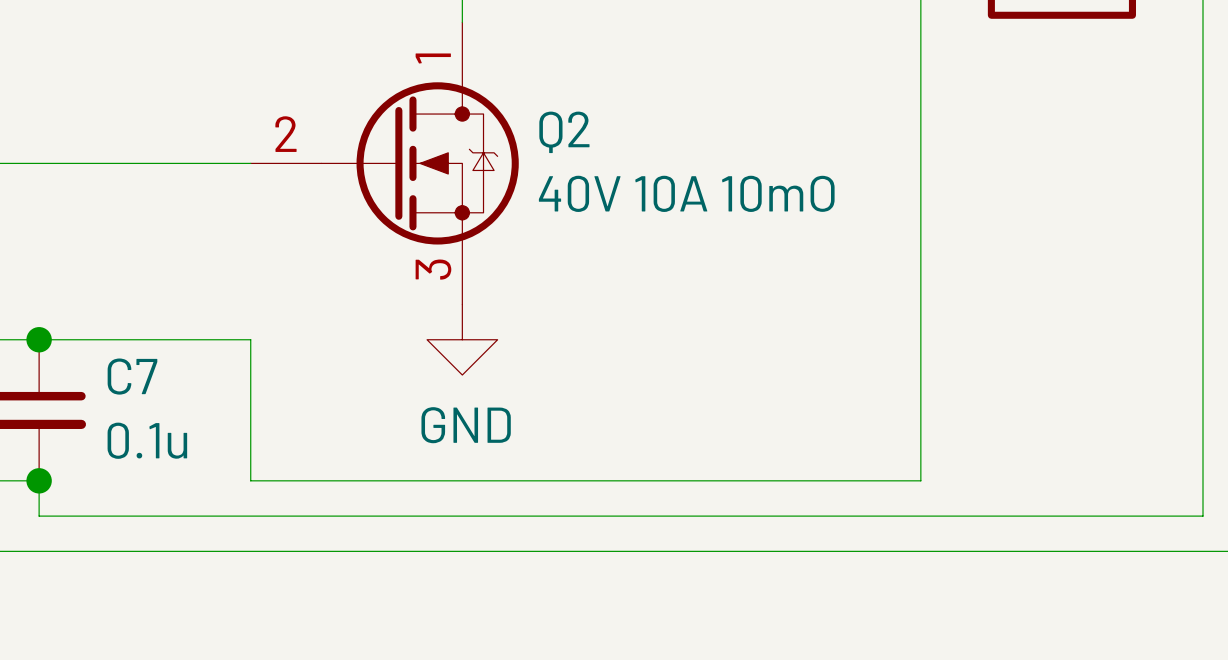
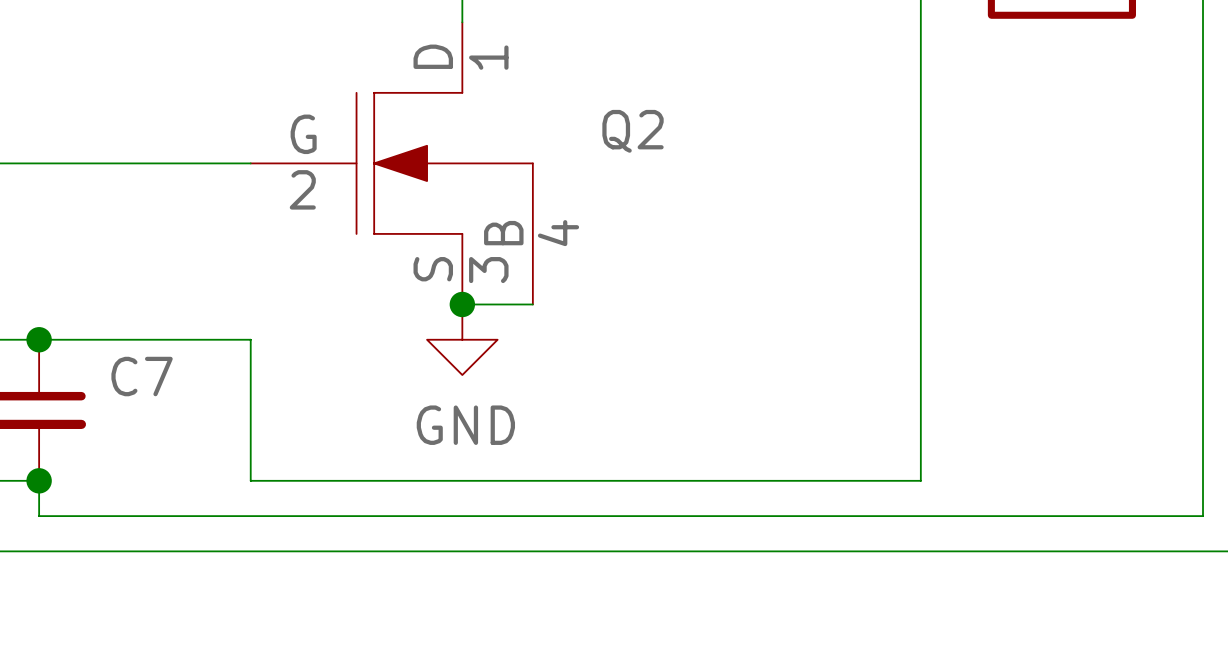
Q2 symbol: [250, 22, 519, 305] -> [250, 22, 533, 305]
Q2 value: 40V 10A 10mO (686, 193) -> none
wire: none -> (462, 304) (532, 304)
junction: none -> (462, 304)
C7 value: 0.1u (147, 440) -> none

